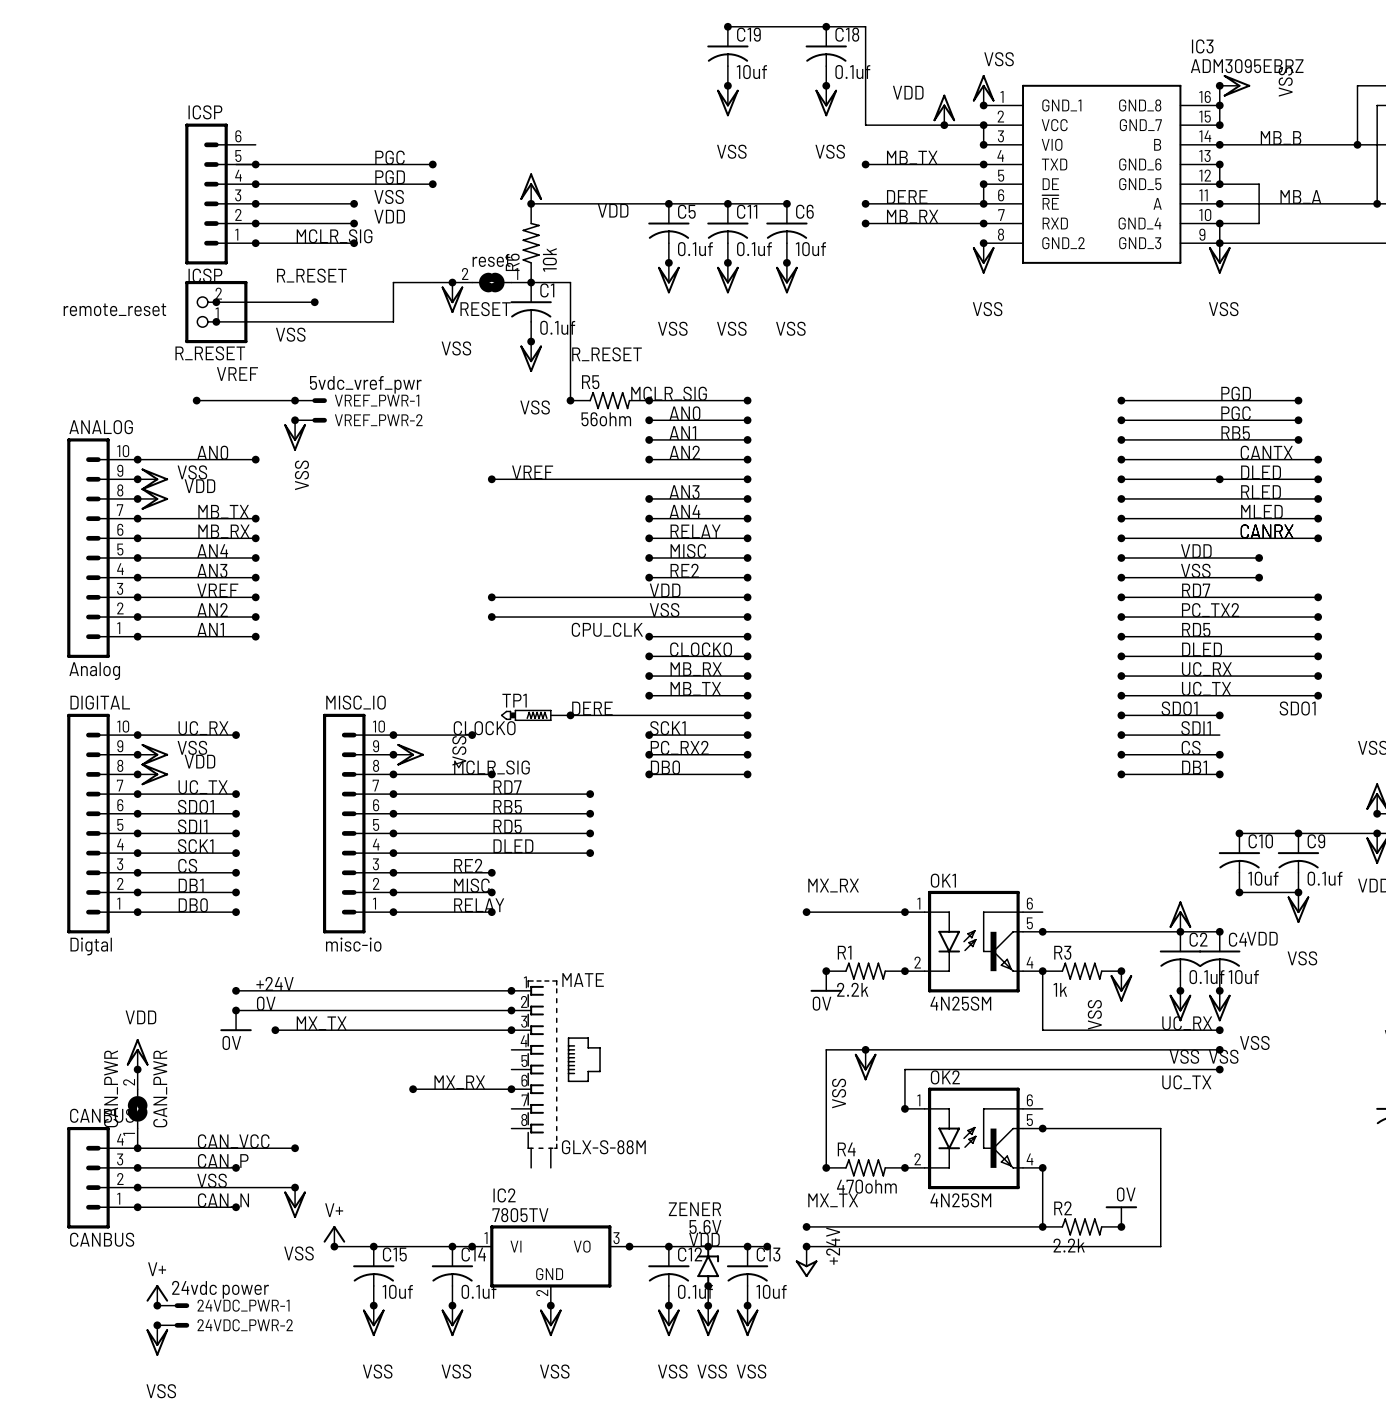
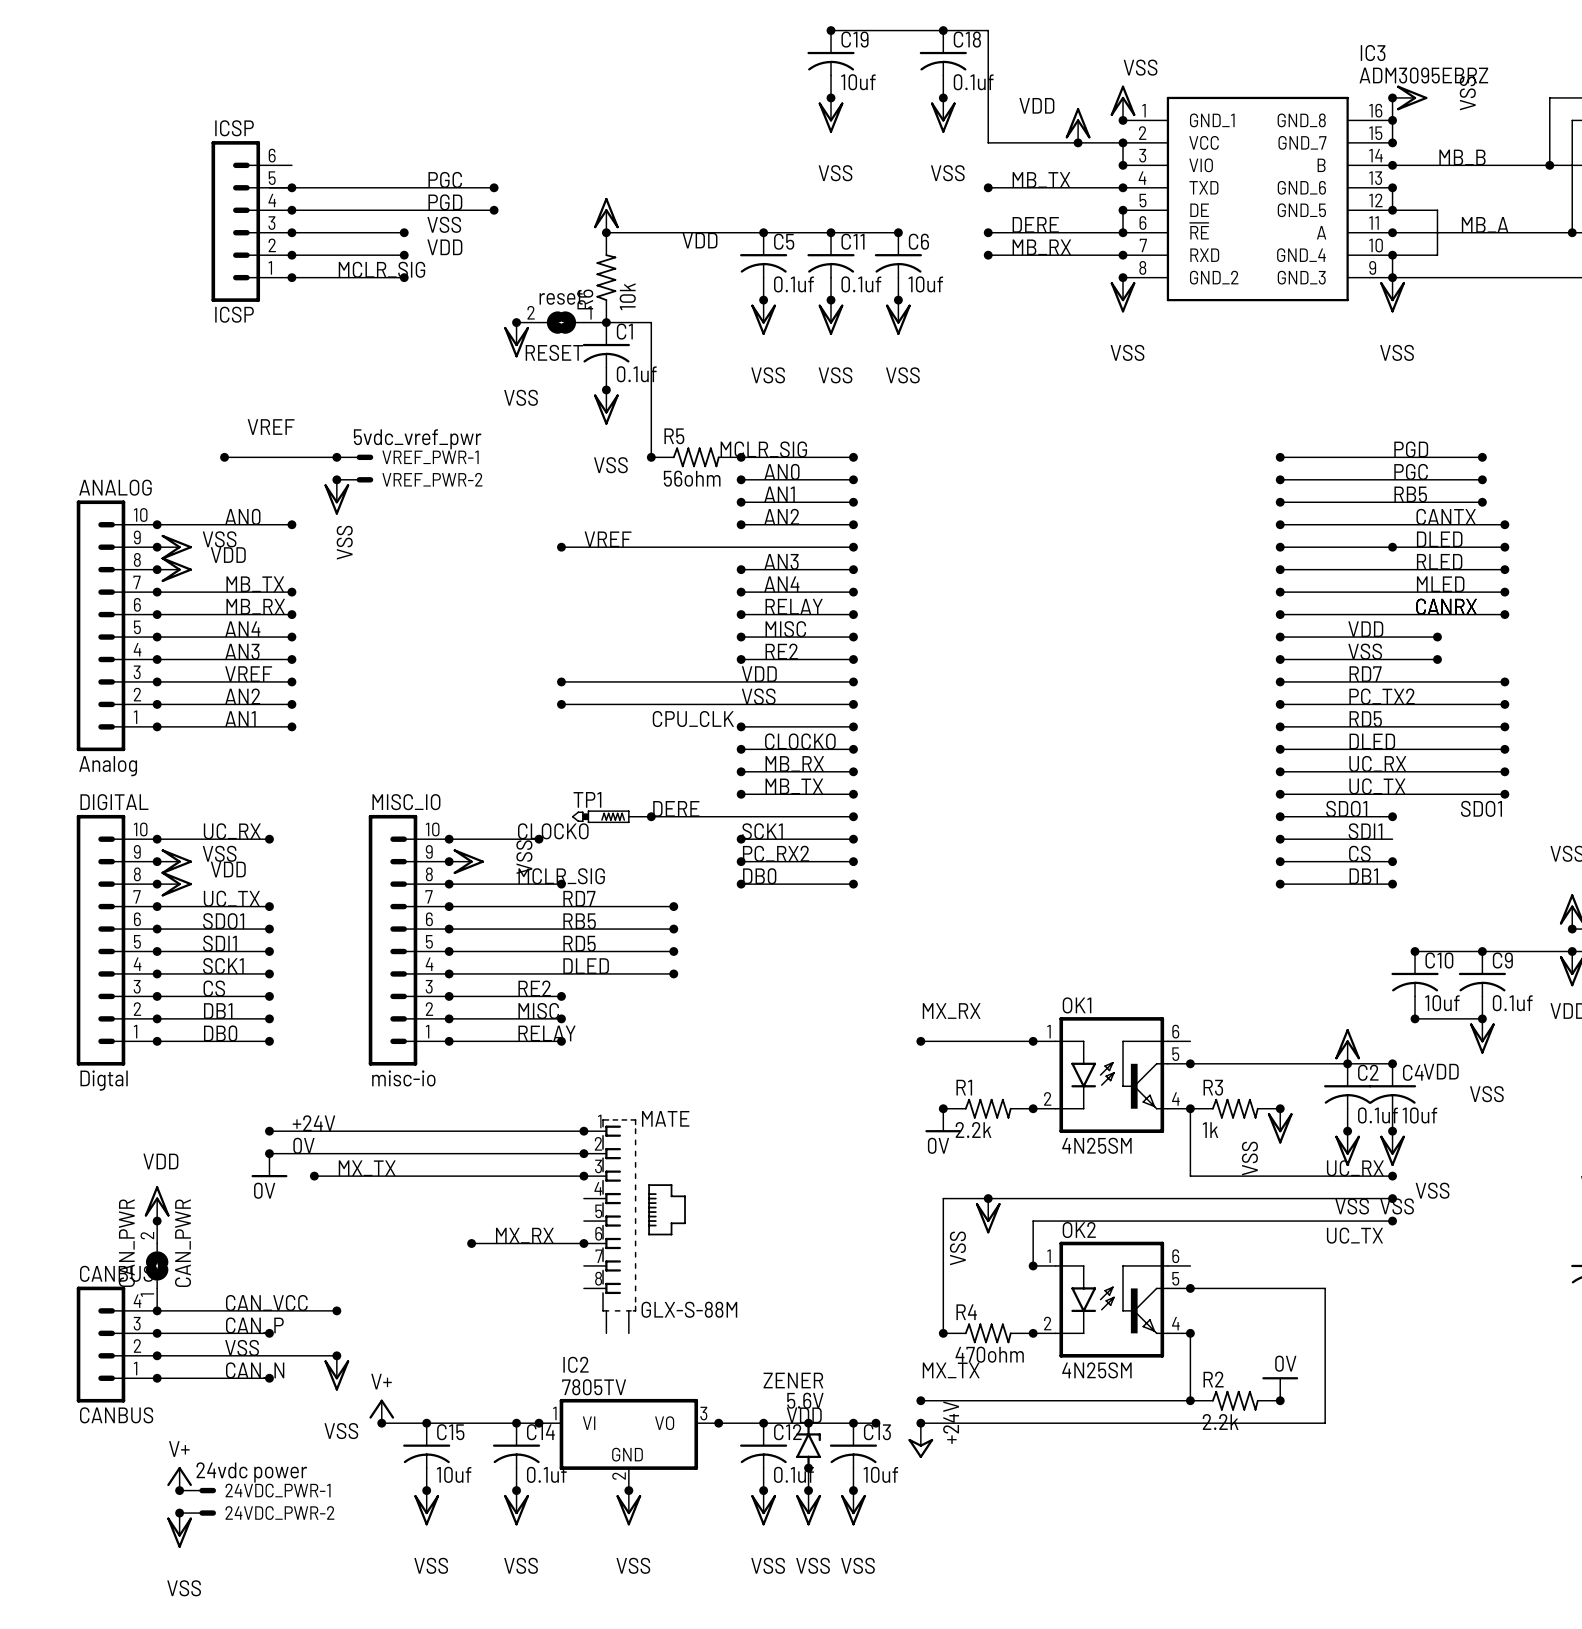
label: R_RESET (311, 275) -> none
wire: (452, 282) (393, 282) (393, 321) (216, 321) -> none
wire: (216, 302) (314, 302) -> none
junction: (216, 302) -> none
junction: (314, 302) -> none
R_RESET: remote_reset (216, 312) -> none
junction: (216, 321) -> none
label: VSS (290, 334) -> none
label: R_RESET (606, 354) -> none

